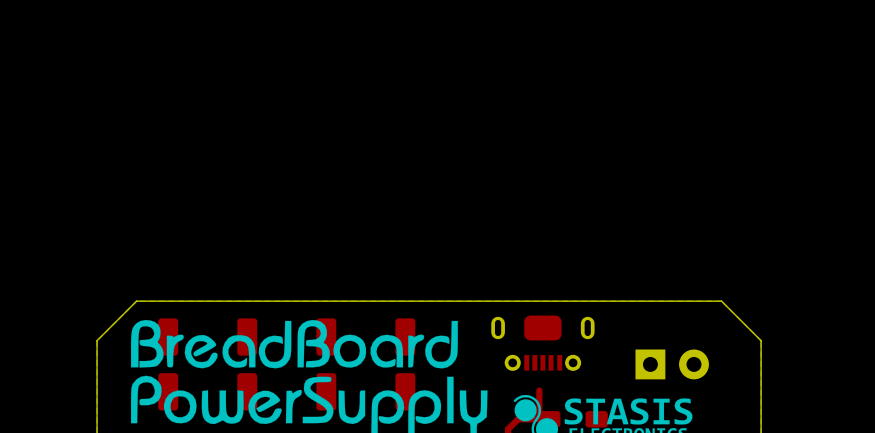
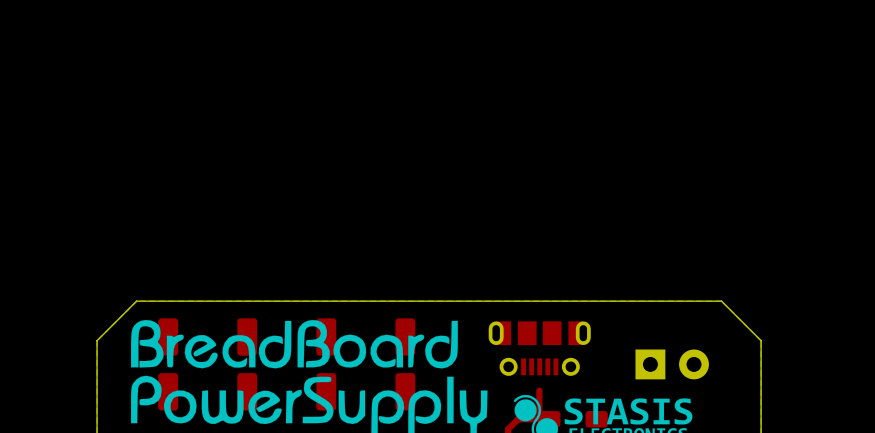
part footprint: [491, 315, 595, 371] -> [488, 321, 591, 376]

